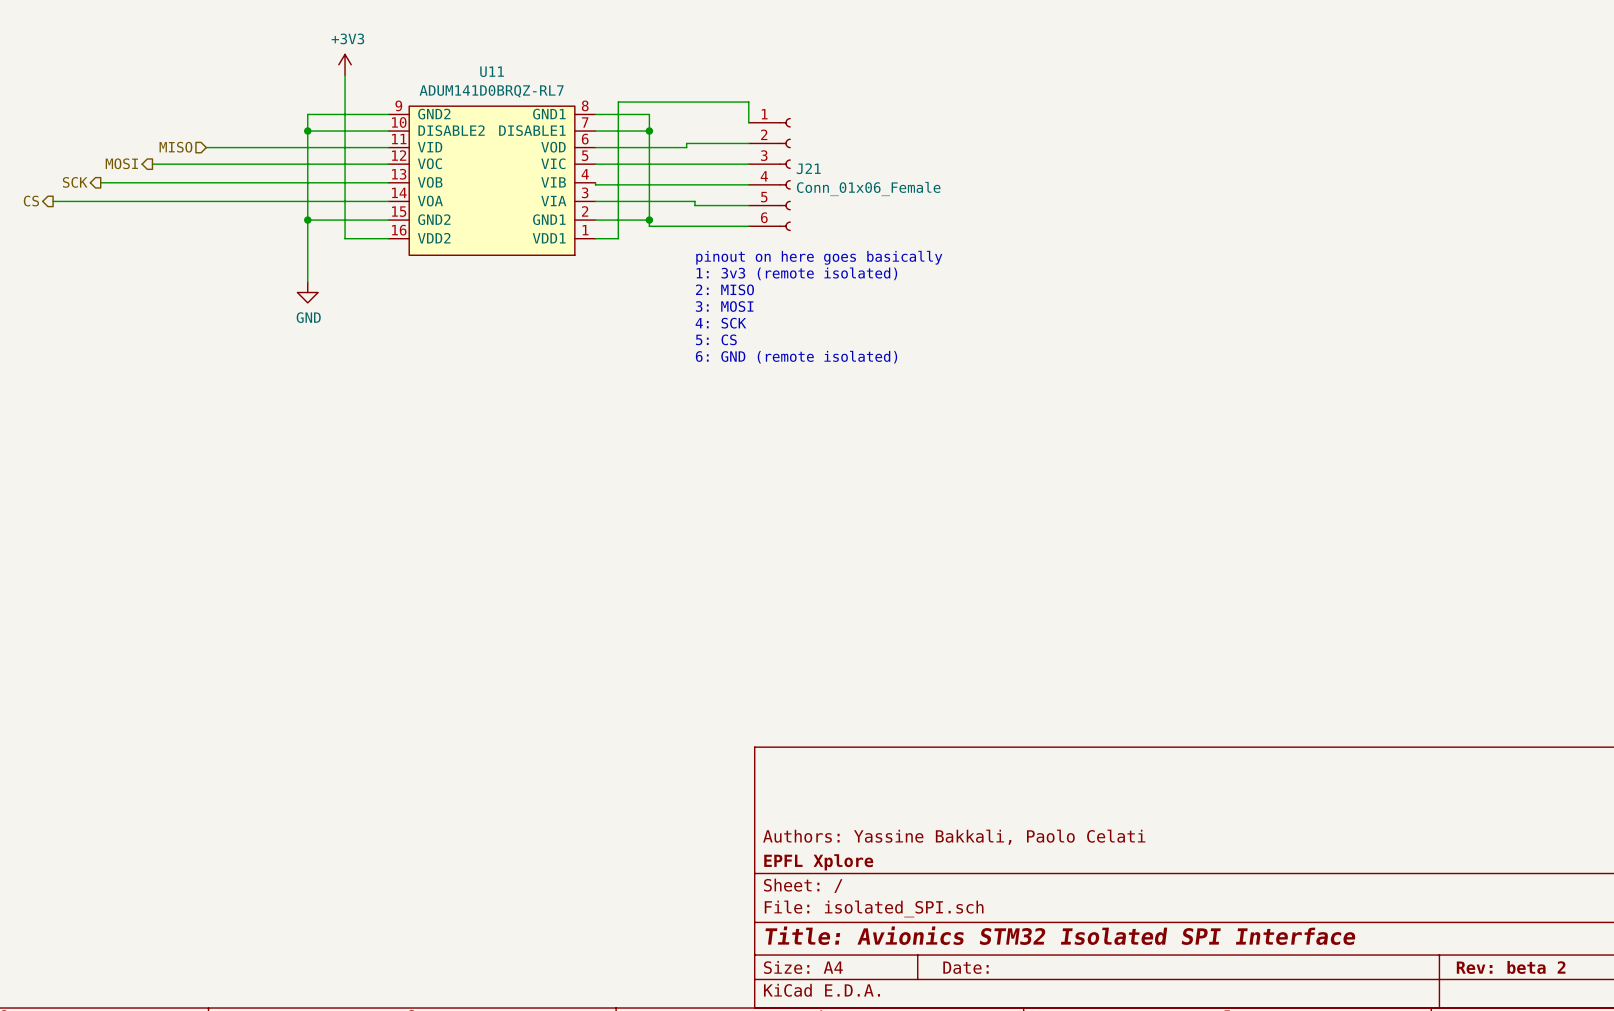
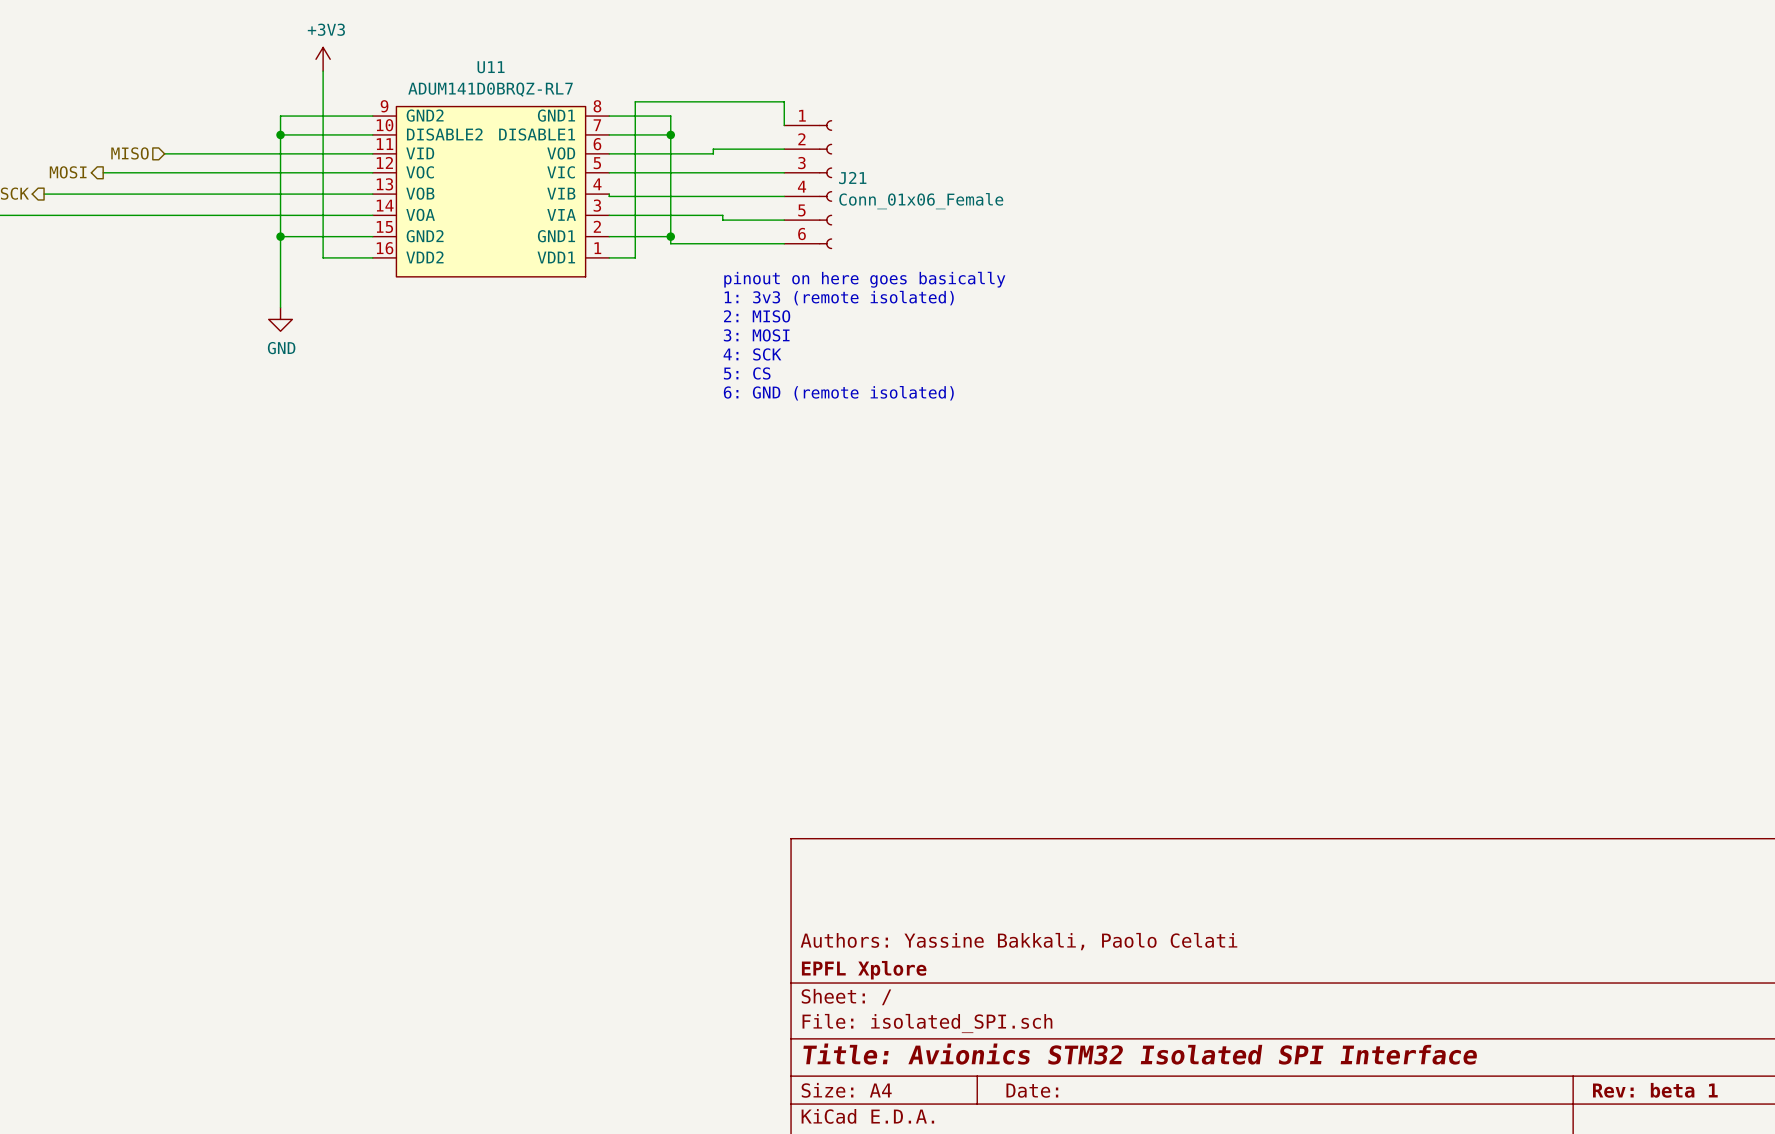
title block: Rev: beta 2 (1511, 967) -> Rev: beta 1 (1655, 1090)

